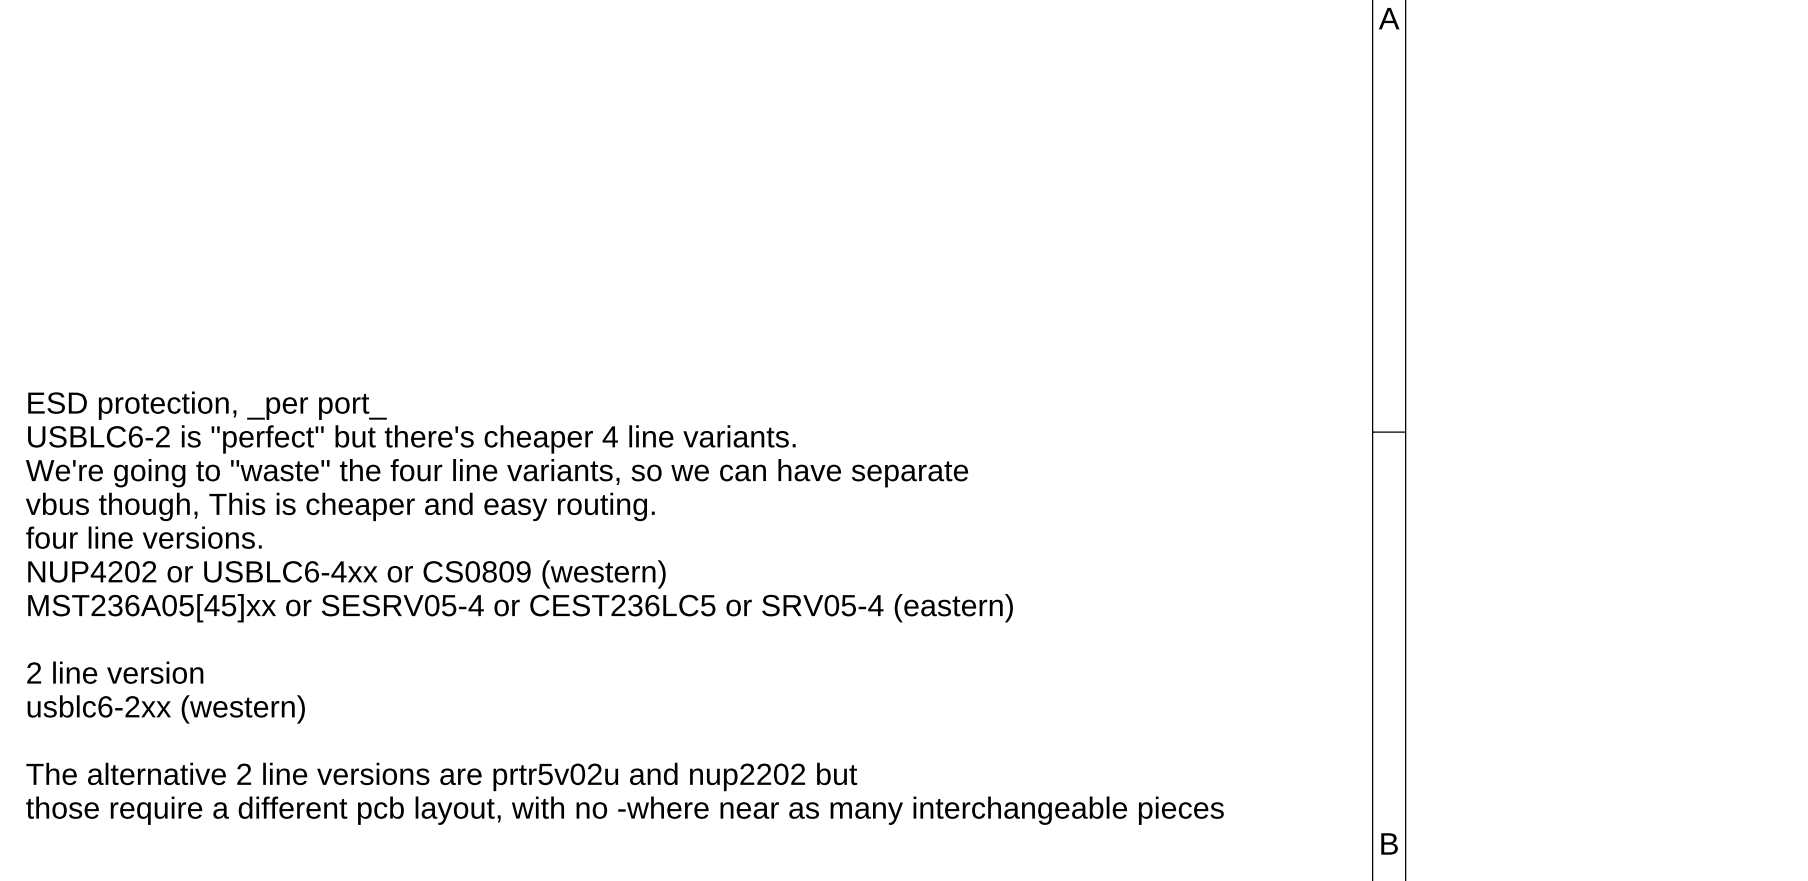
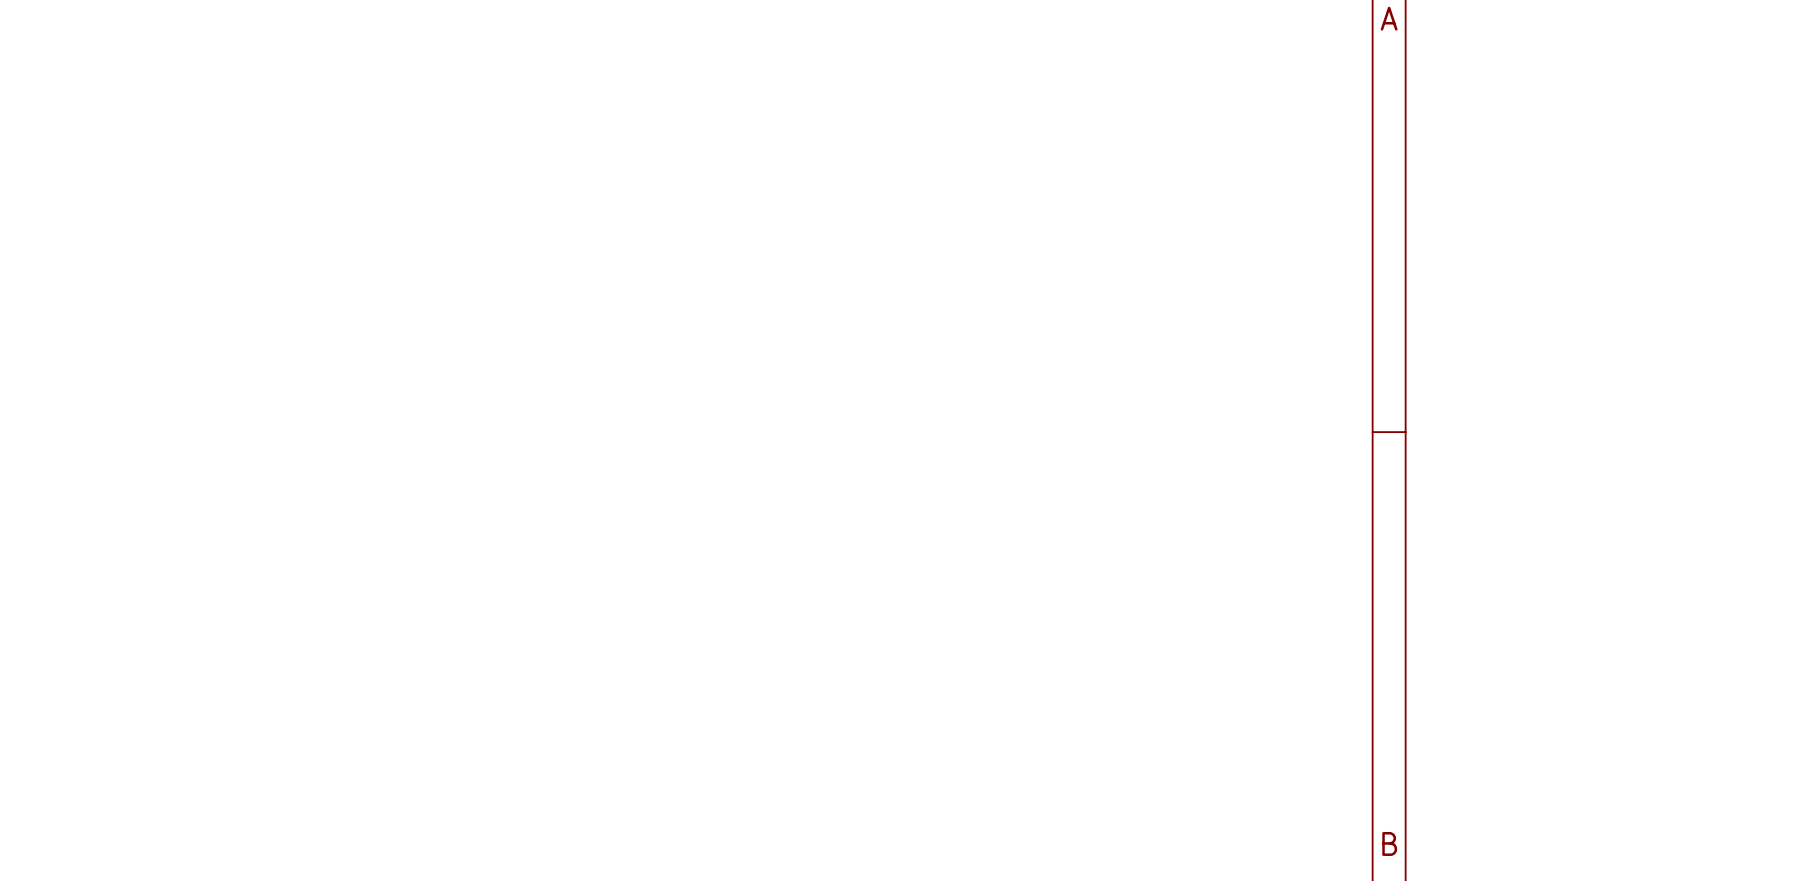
text: ESD protection, _per port_ (207, 405) -> none
text: USBLC6-2 is "perfect" but there's cheaper 4 line variants. (411, 439) -> none
text: We're going to "waste" the four line variants, so we can have separate (497, 473) -> none
text: vbus though, This is cheaper and easy routing. (340, 506) -> none
text: four line versions. (143, 537) -> none
text: NUP4202 or USBLC6-4xx or CS0809 (western) (346, 574) -> none
text: MST236A05[45]xx or SESRV05-4 or CEST236LC5 or SRV05-4 (eastern) (520, 608) -> none
text: 2 line version (115, 672) -> none
text: usblc6-2xx (western) (166, 709) -> none
text: The alternative 2 line versions are prtr5v02u and nup2202 but (441, 776) -> none
text: those require a different pcb layout, with no -where near as many interchangeable pieces (625, 810) -> none

